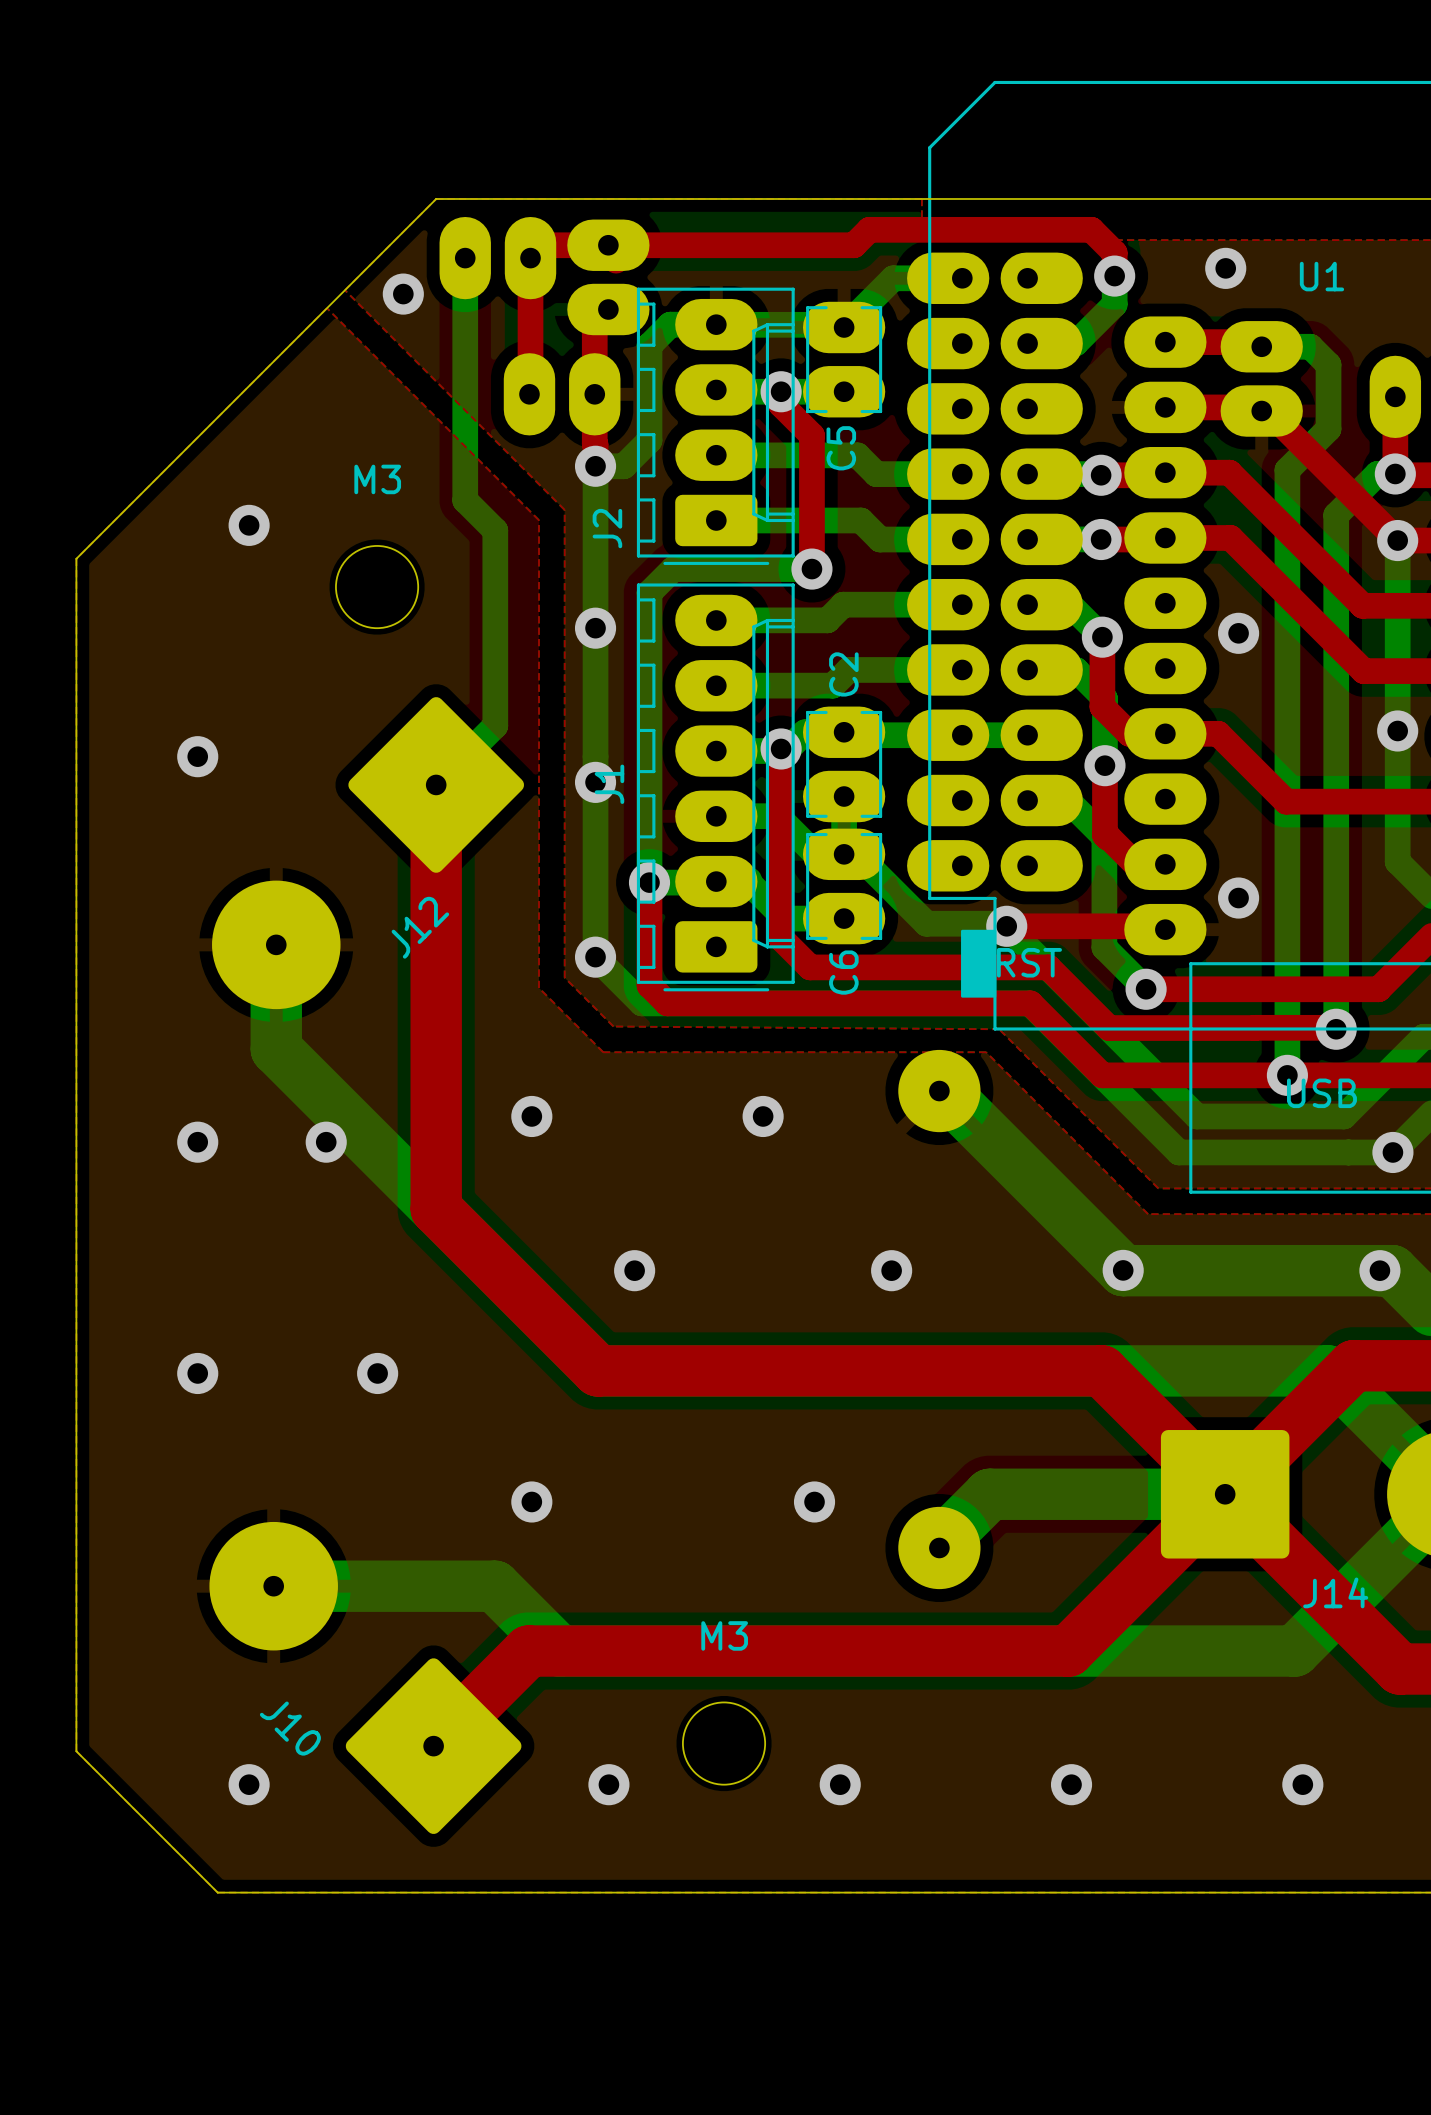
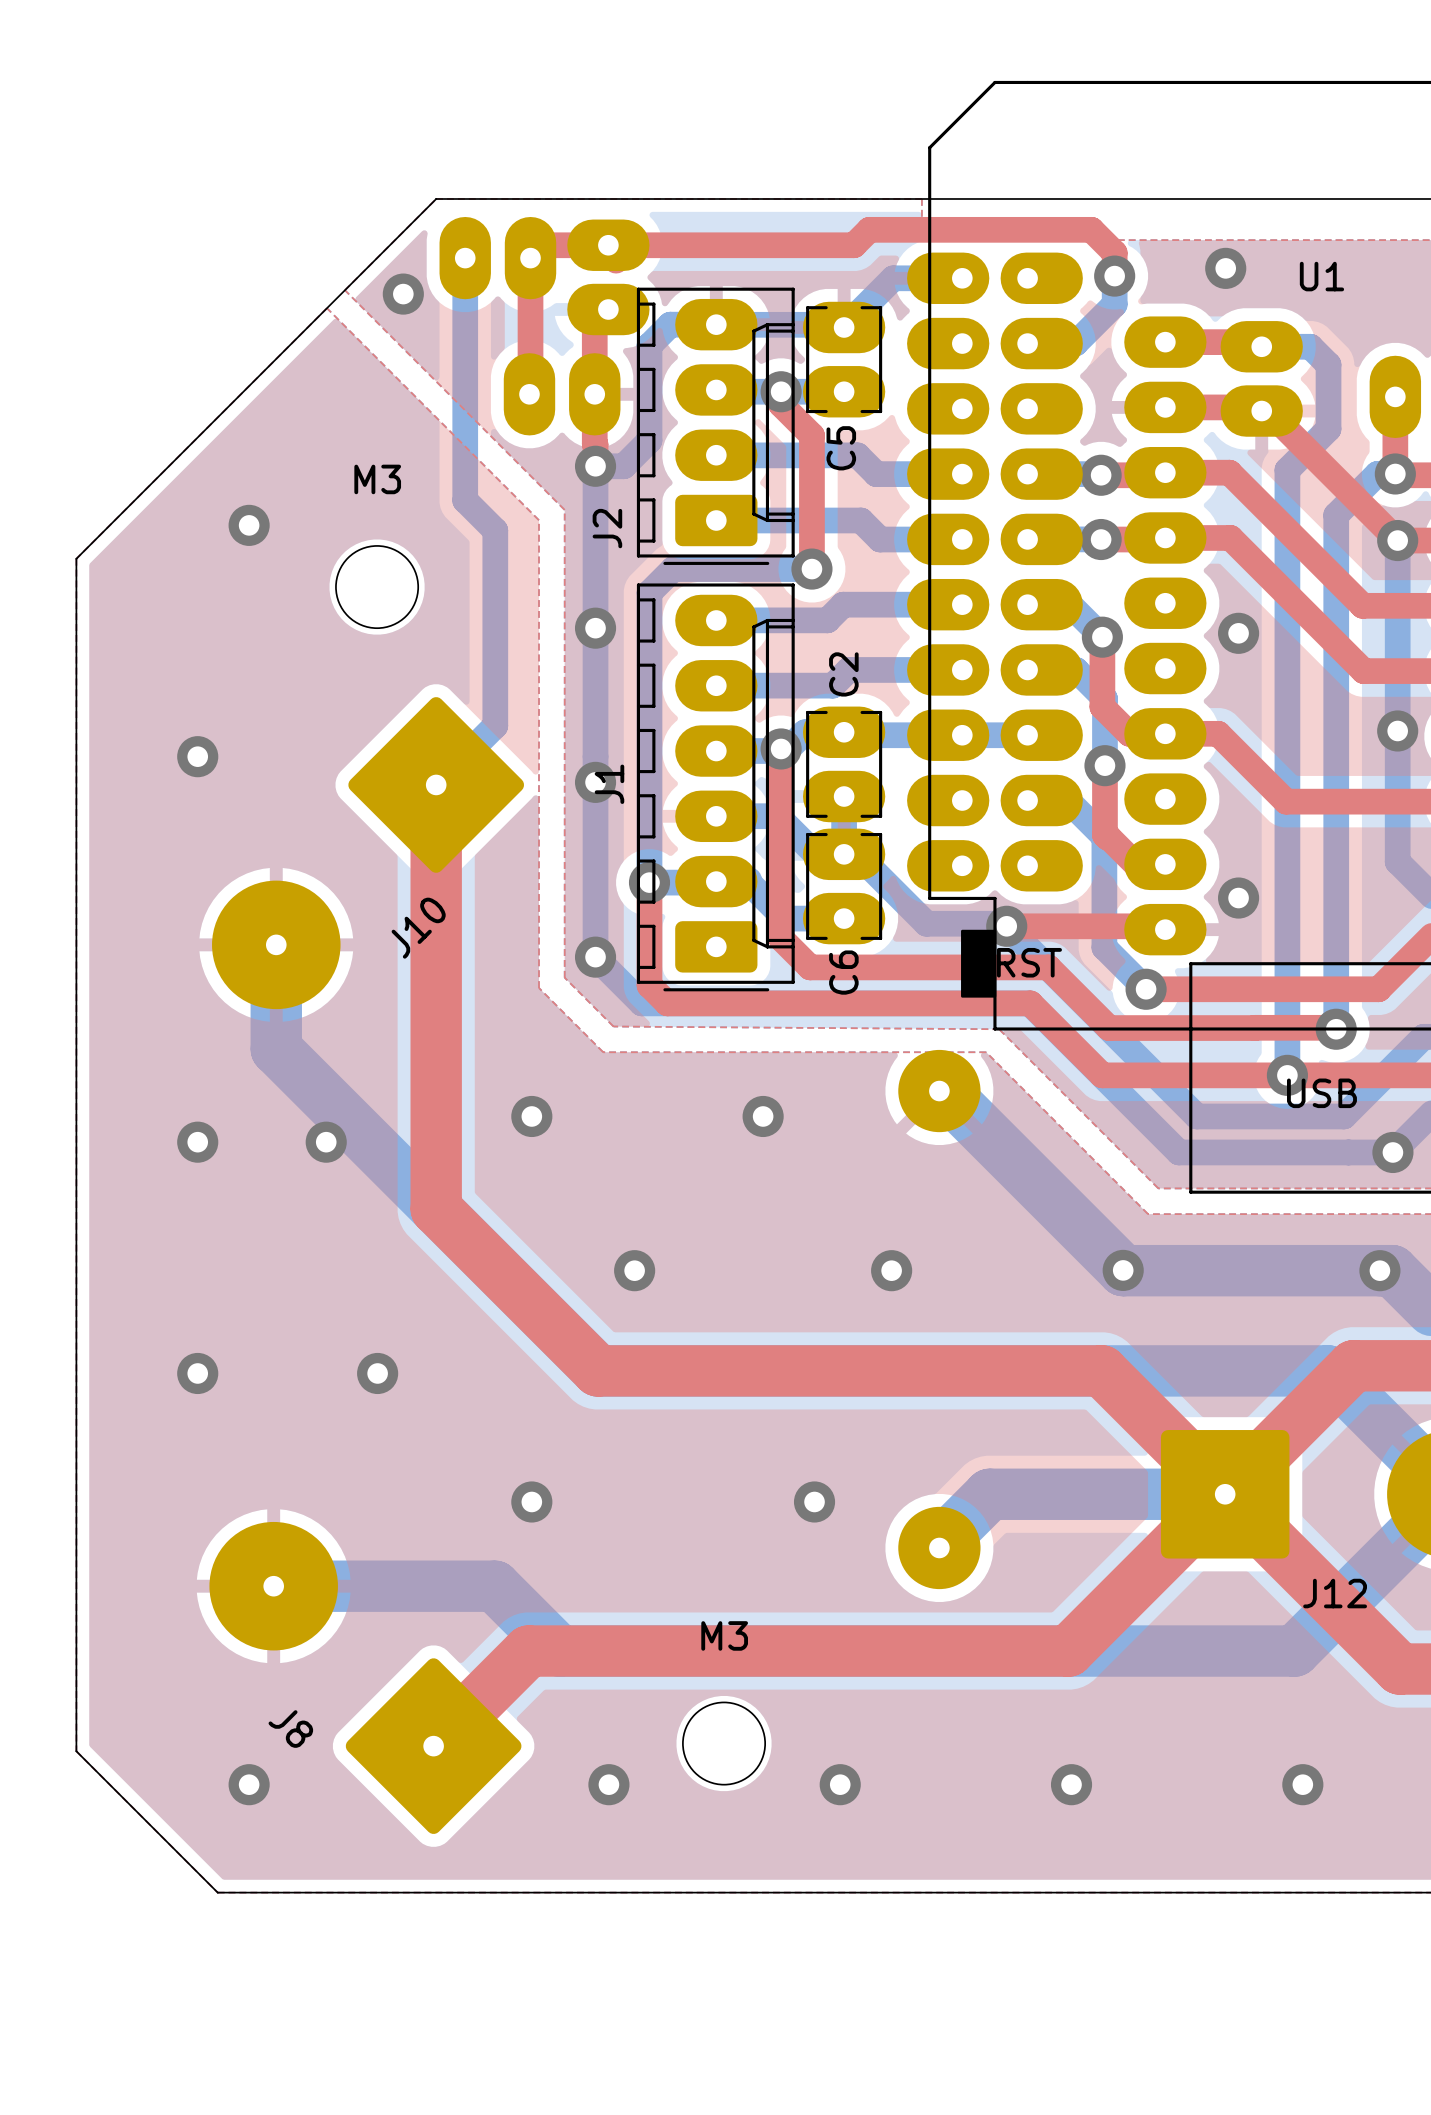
J12 name: J12 (420, 927) -> J10 (418, 928)
J14 name: J14 (1335, 1592) -> J12 (1335, 1593)
J10 name: J10 (290, 1728) -> J8 (290, 1729)

